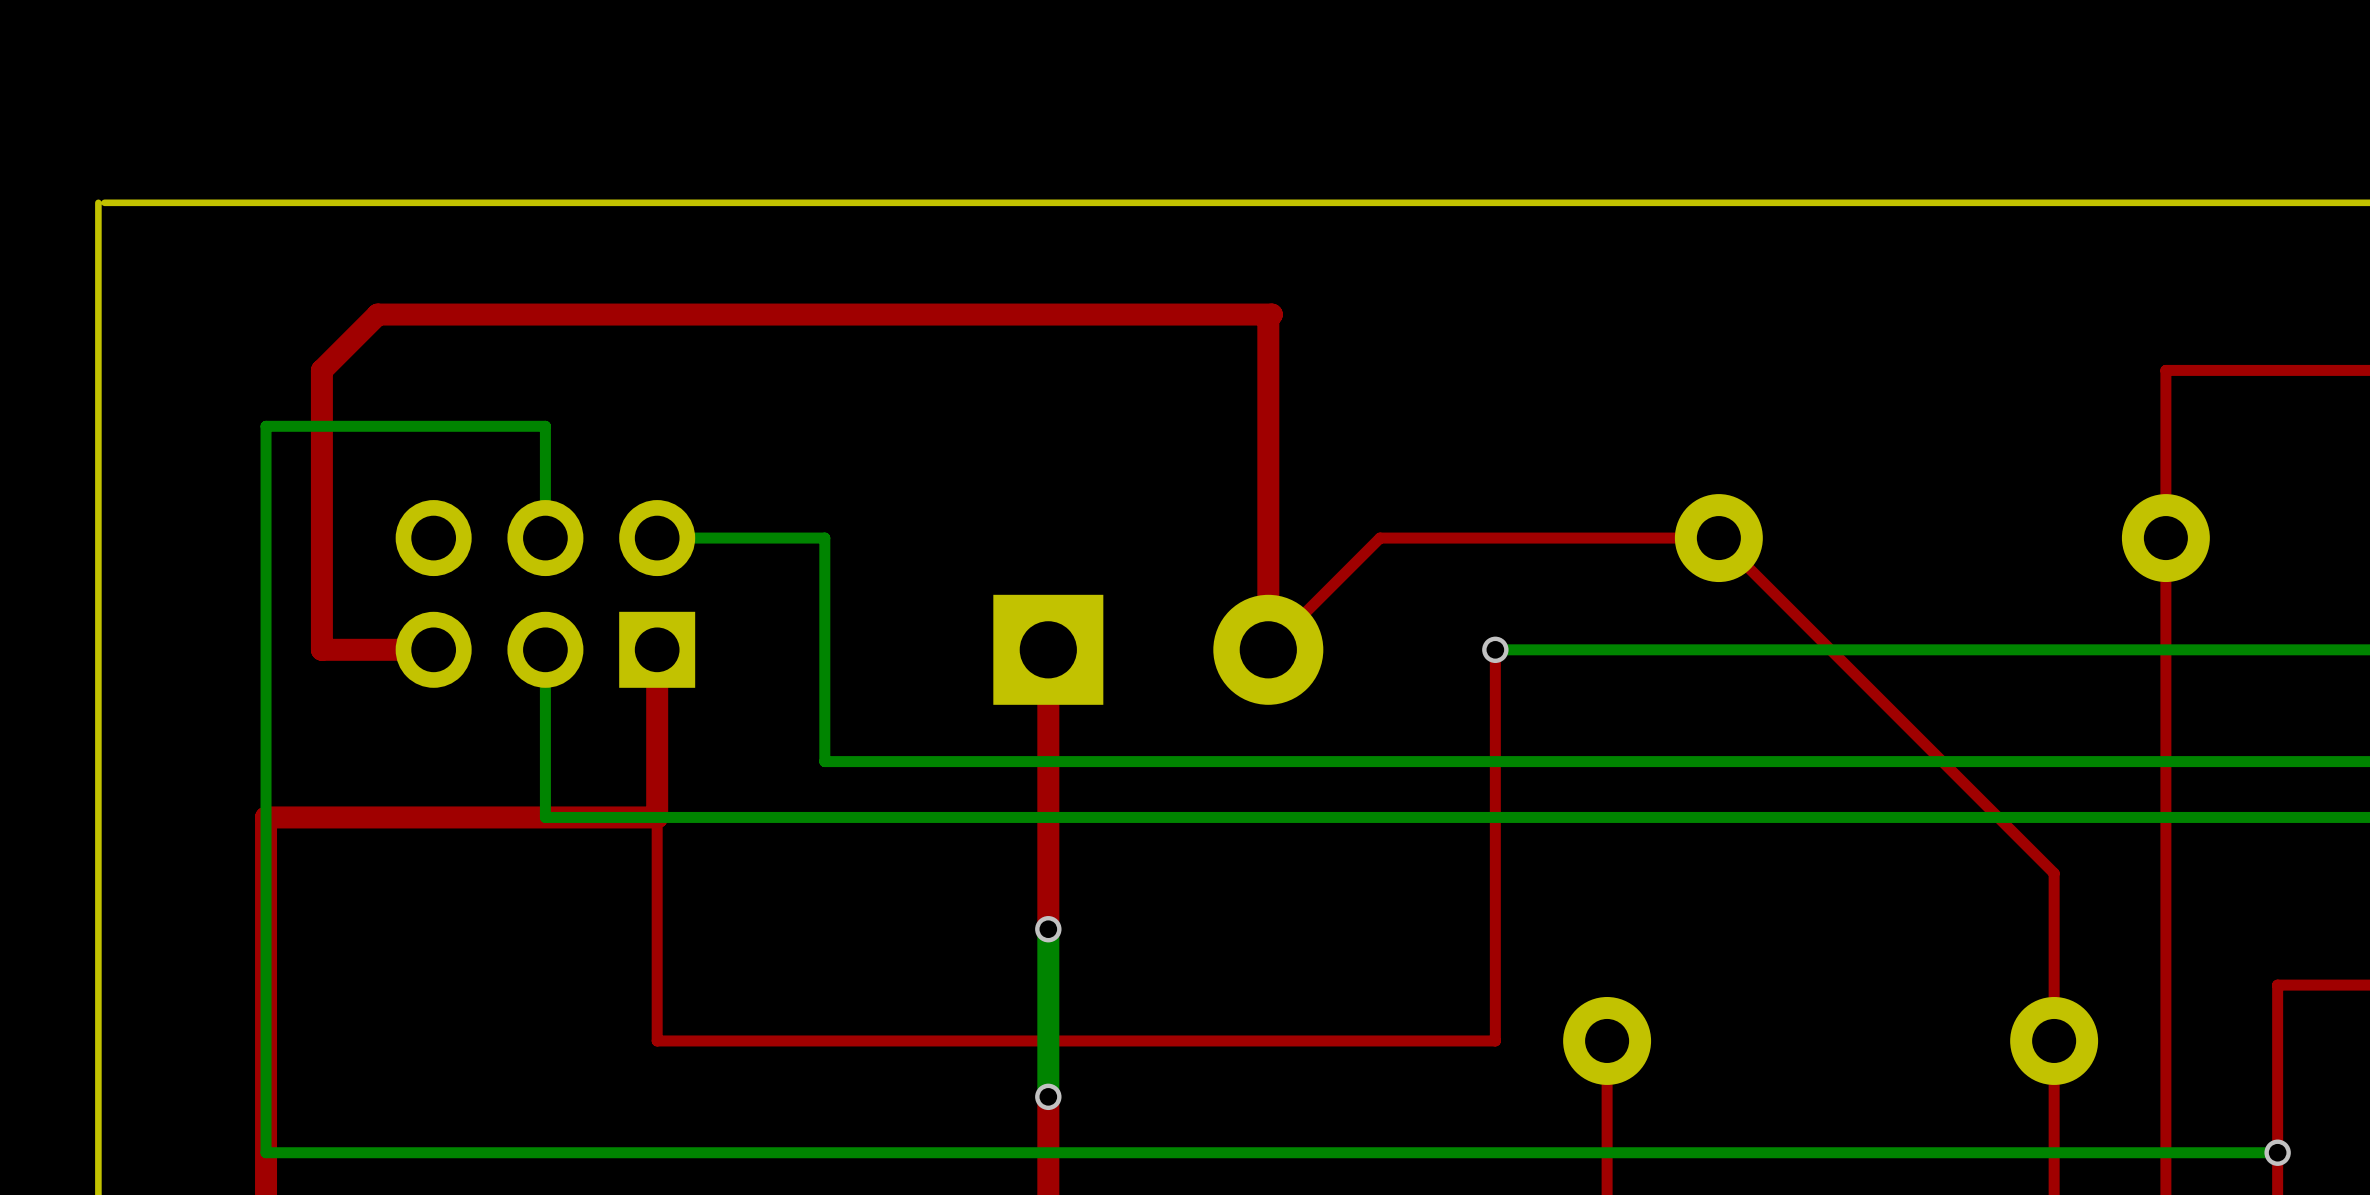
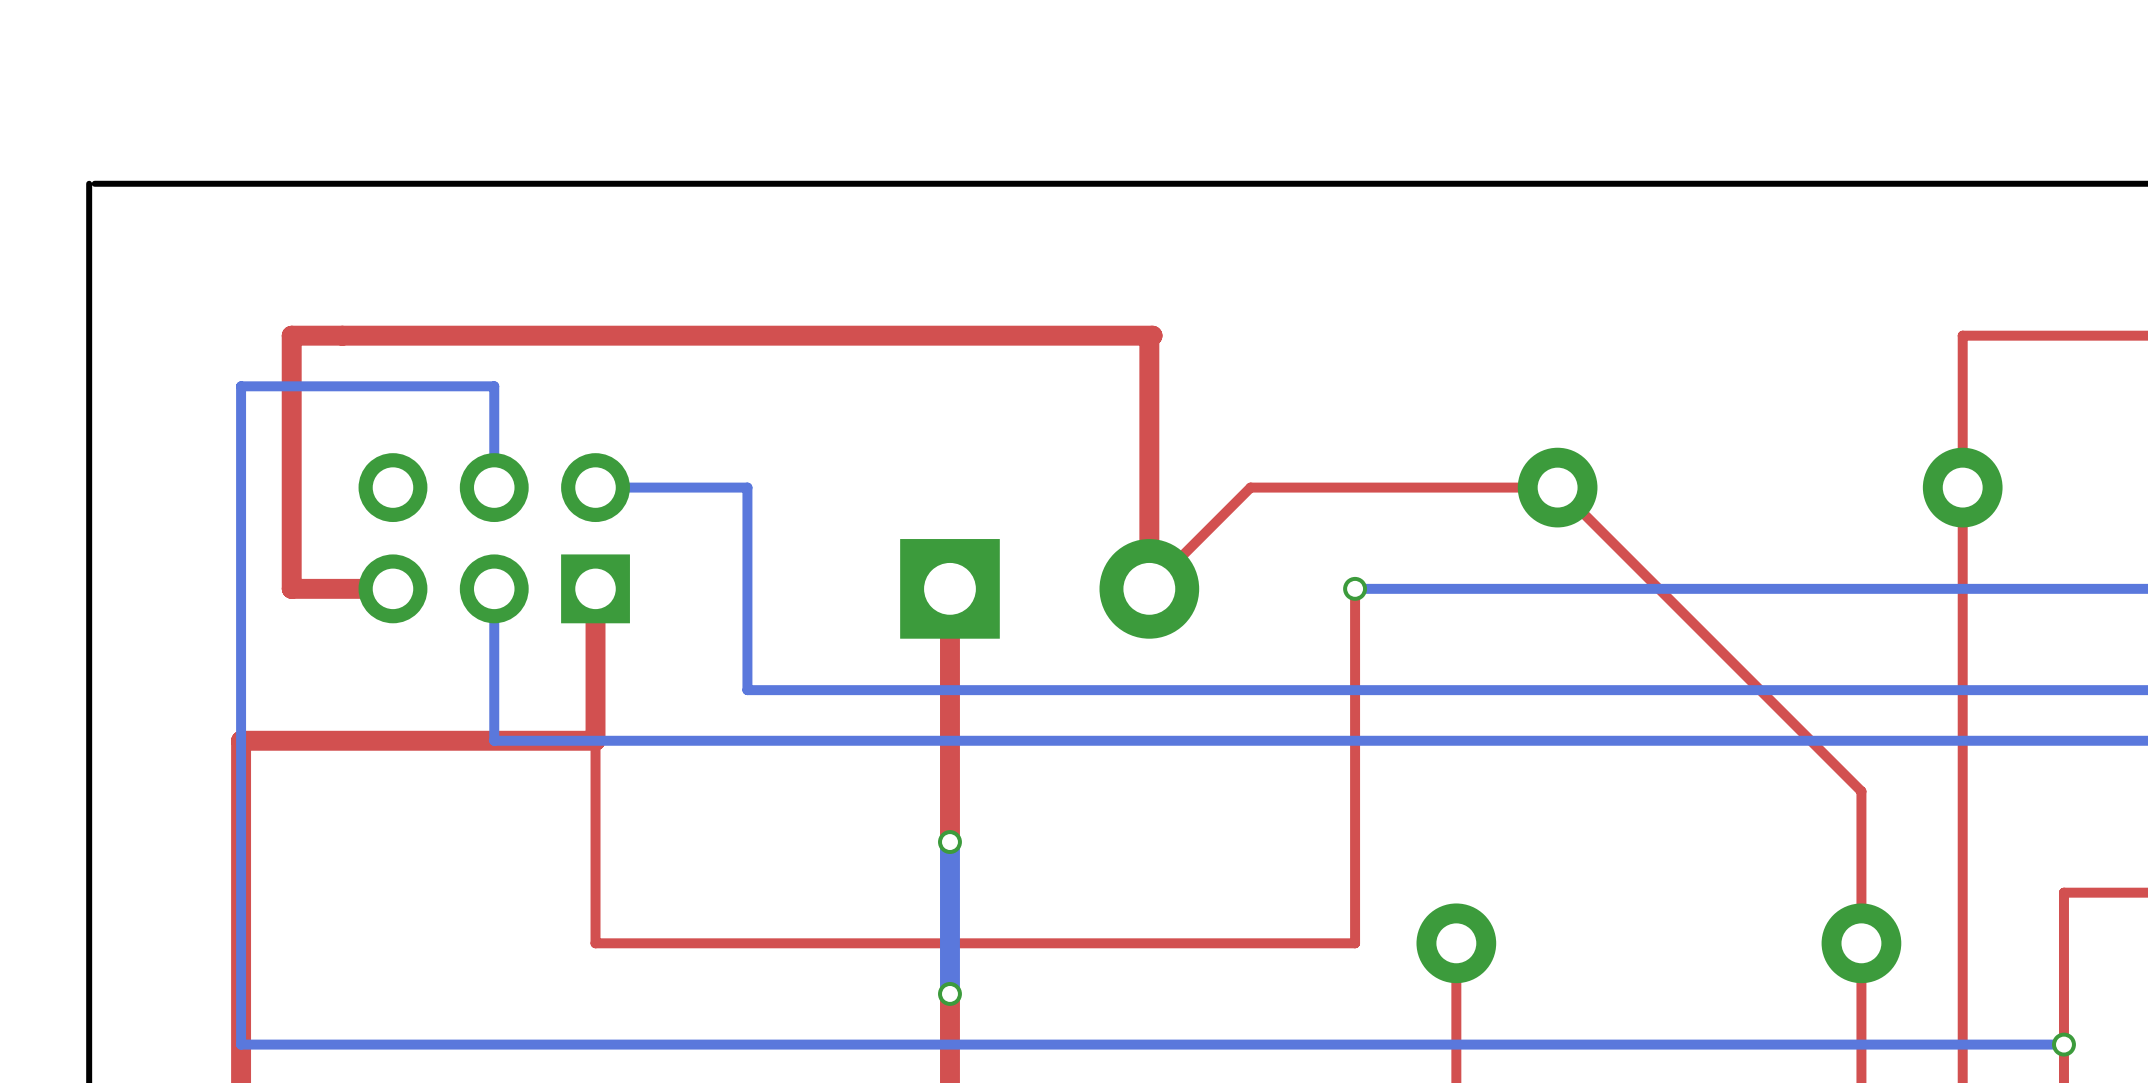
top track: (321, 370) (377, 314) (1271, 314) (1268, 318) (1268, 373) -> (291, 335) (1152, 335) (1149, 338)

